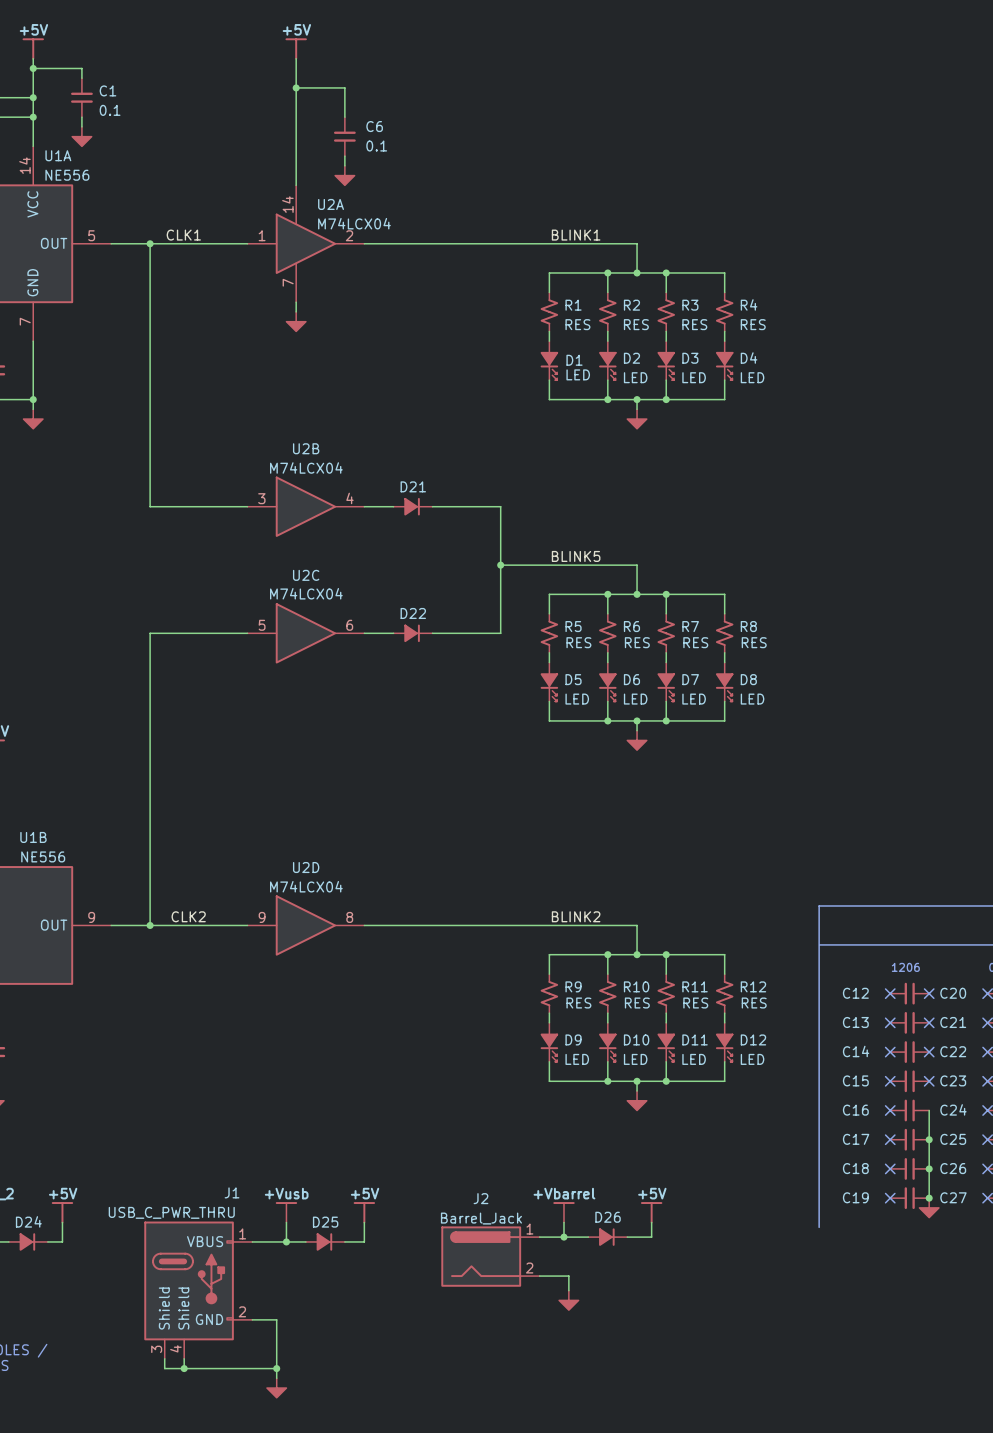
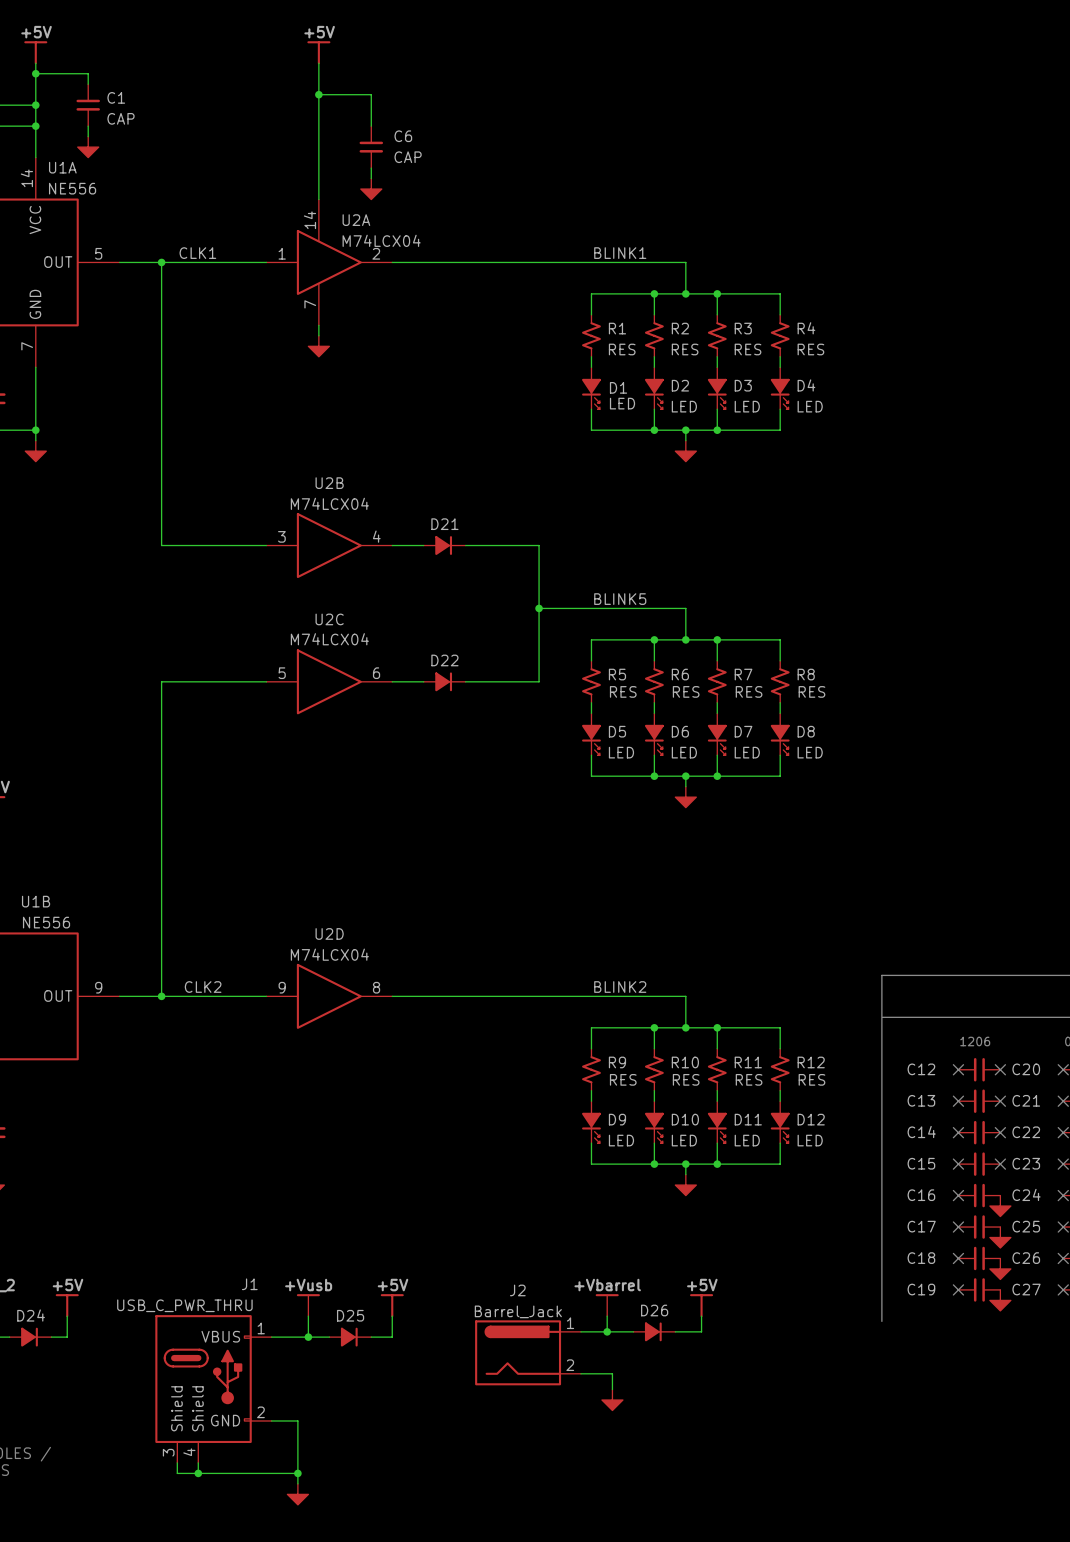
C1 value: 0.1 (110, 110) -> CAP (121, 118)
C6 value: 0.1 (376, 146) -> CAP (408, 157)
power symbol: none -> (1000, 1206)
junction: (929, 1139) -> none
power symbol: none -> (1000, 1237)
junction: (929, 1168) -> none
power symbol: none -> (1000, 1268)
junction: (929, 1198) -> none

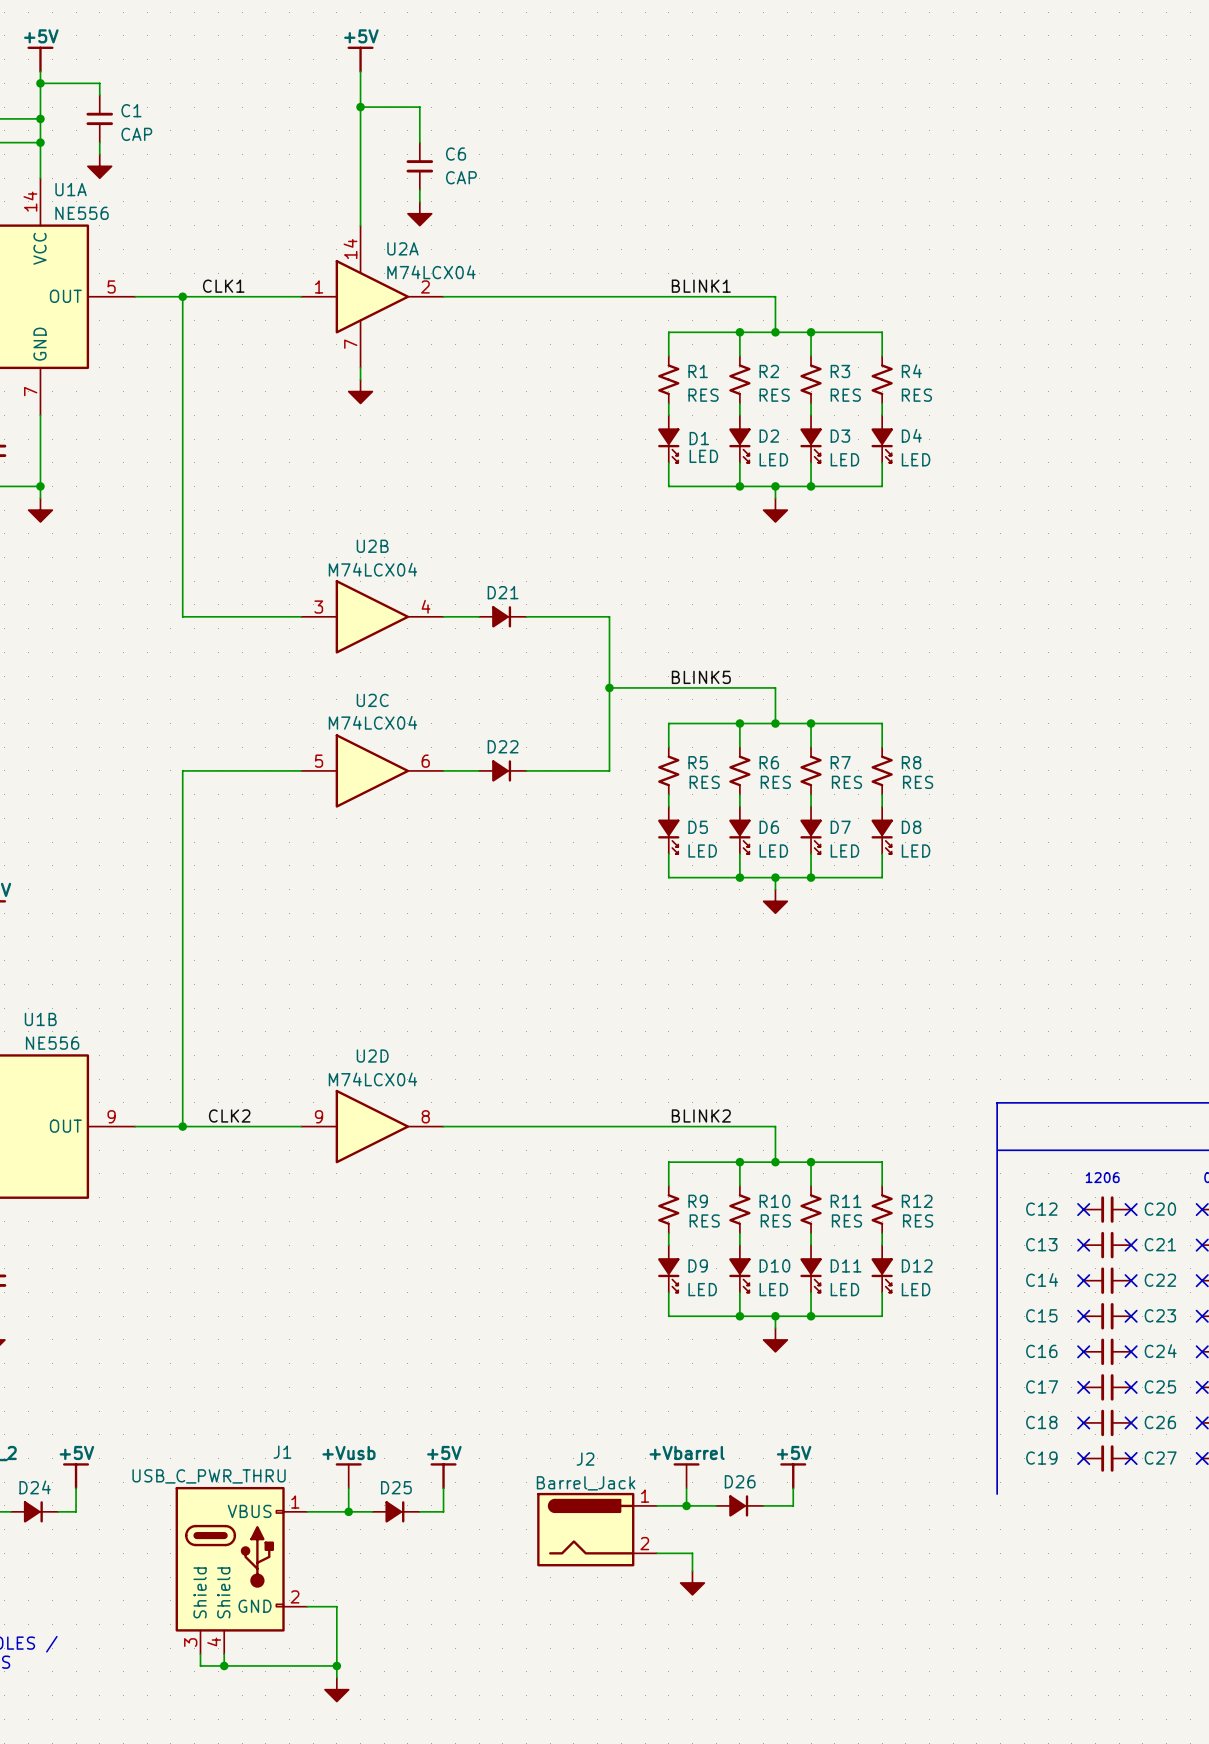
no-connect mark: none -> (1131, 1351)
power symbol: (1000, 1206) -> none
no-connect mark: none -> (1131, 1387)
power symbol: (1000, 1237) -> none
no-connect mark: none -> (1131, 1422)
power symbol: (1000, 1268) -> none
no-connect mark: none -> (1131, 1458)
power symbol: (1000, 1300) -> none

